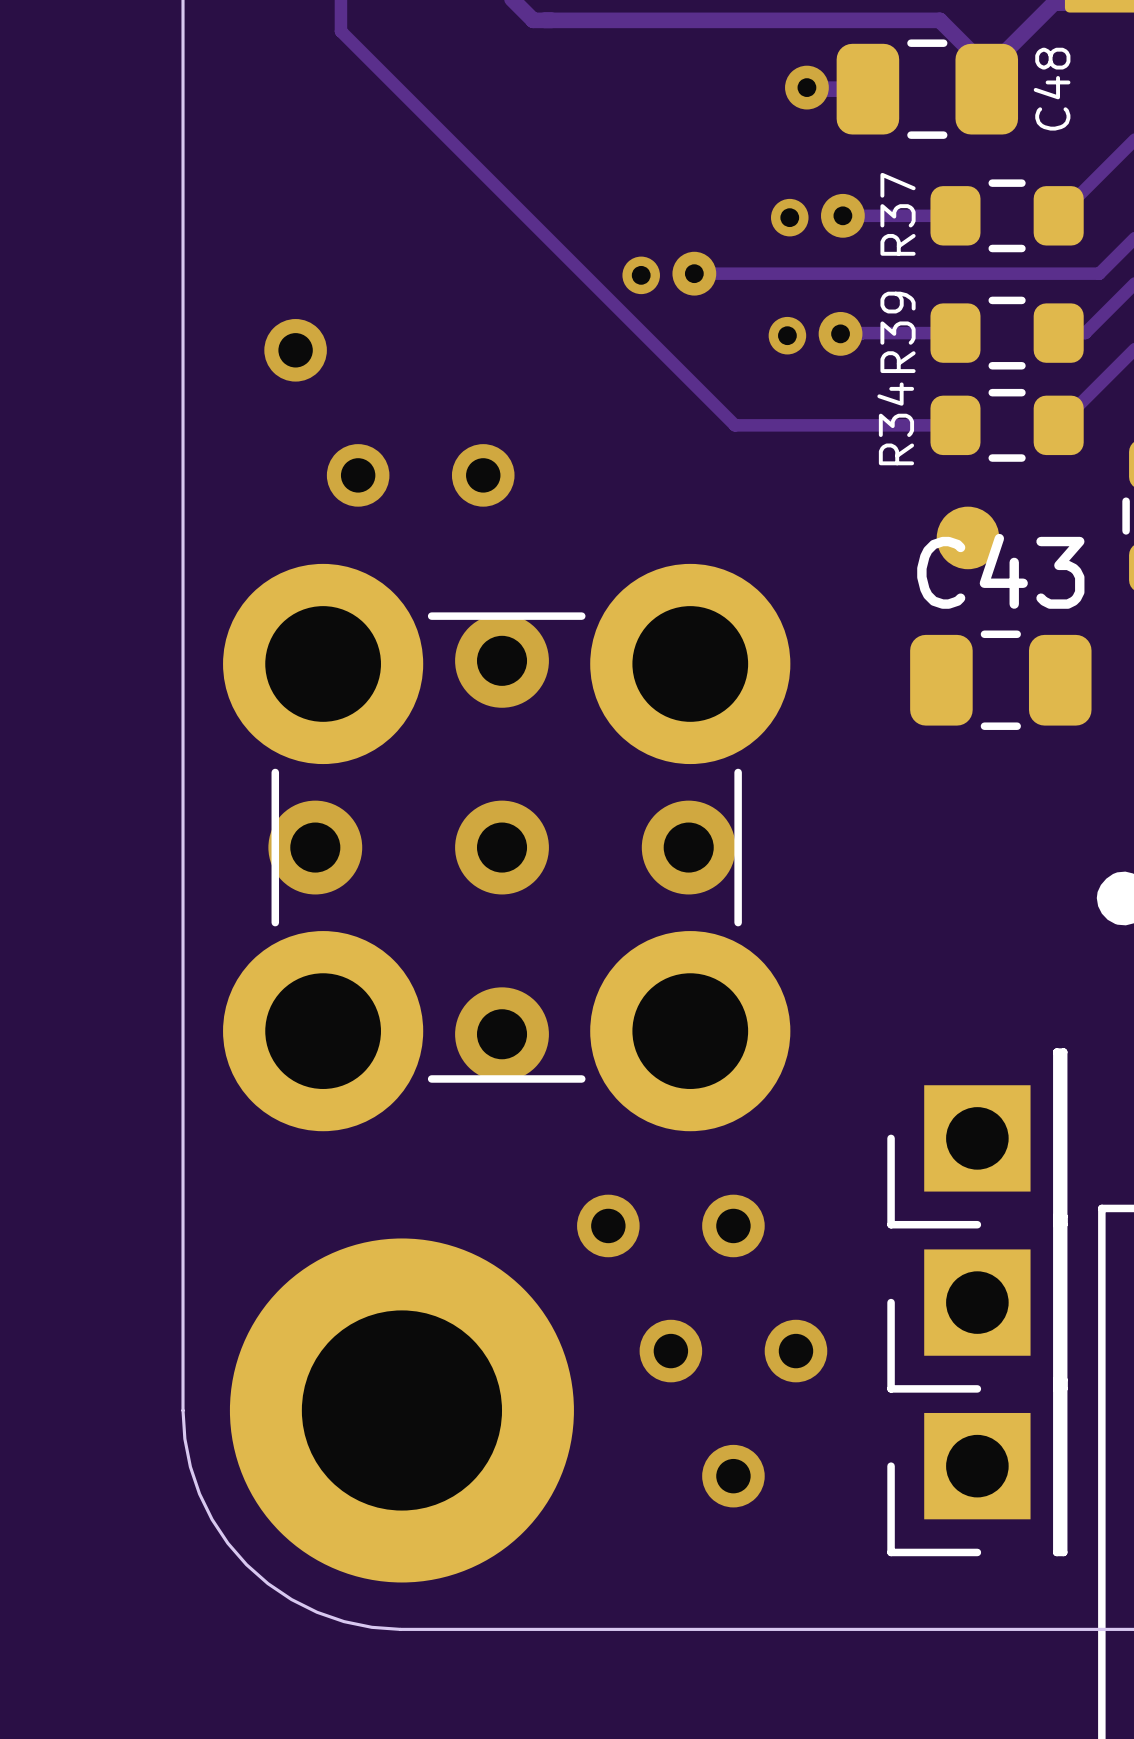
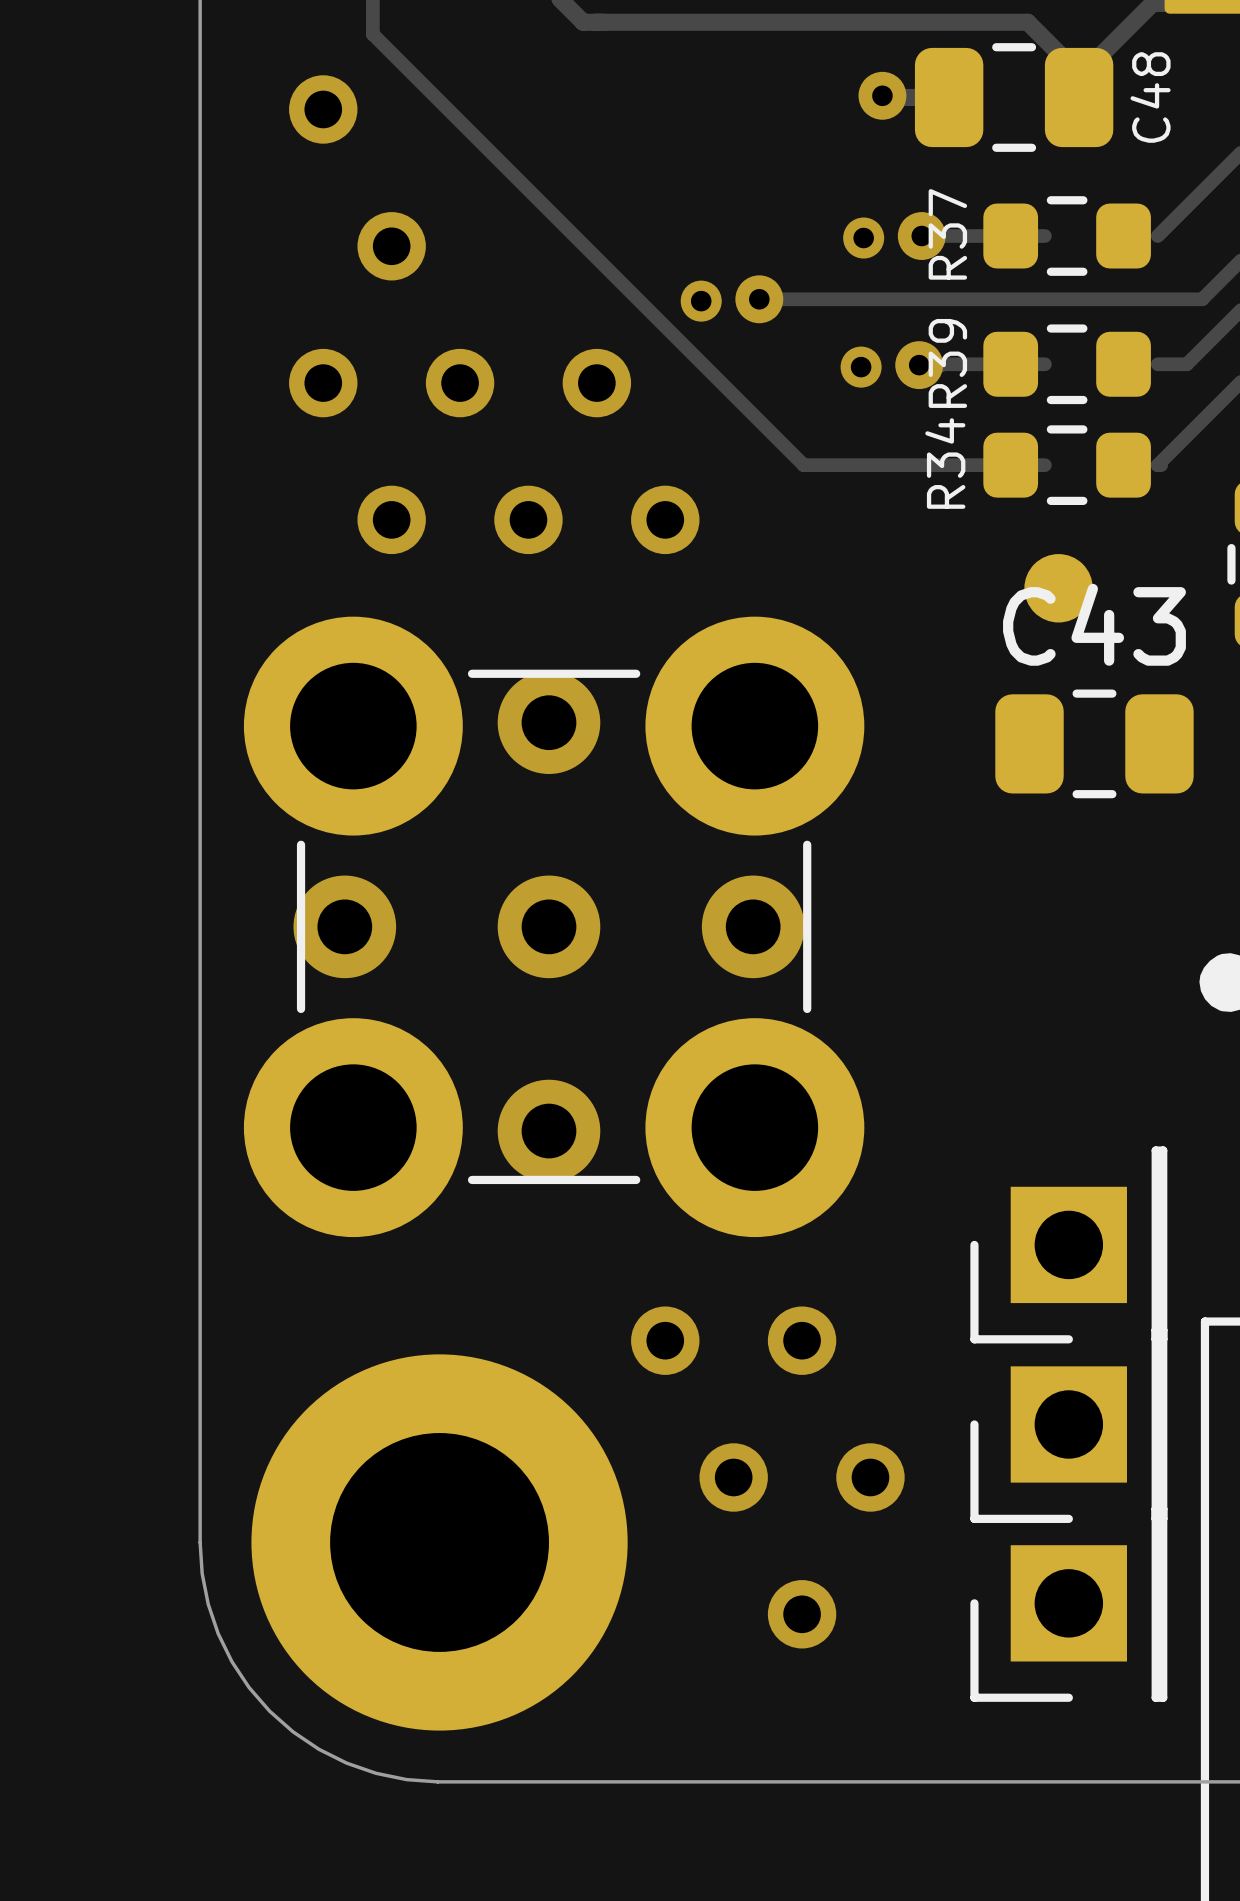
via: none -> (323, 109)
R37 position: (1007, 215) -> (1067, 236)
via: none -> (391, 246)
R39 position: (1007, 333) -> (1067, 364)
via: none -> (460, 383)
via: none -> (596, 383)
R34 position: (1007, 425) -> (1067, 465)
via: none -> (665, 519)

